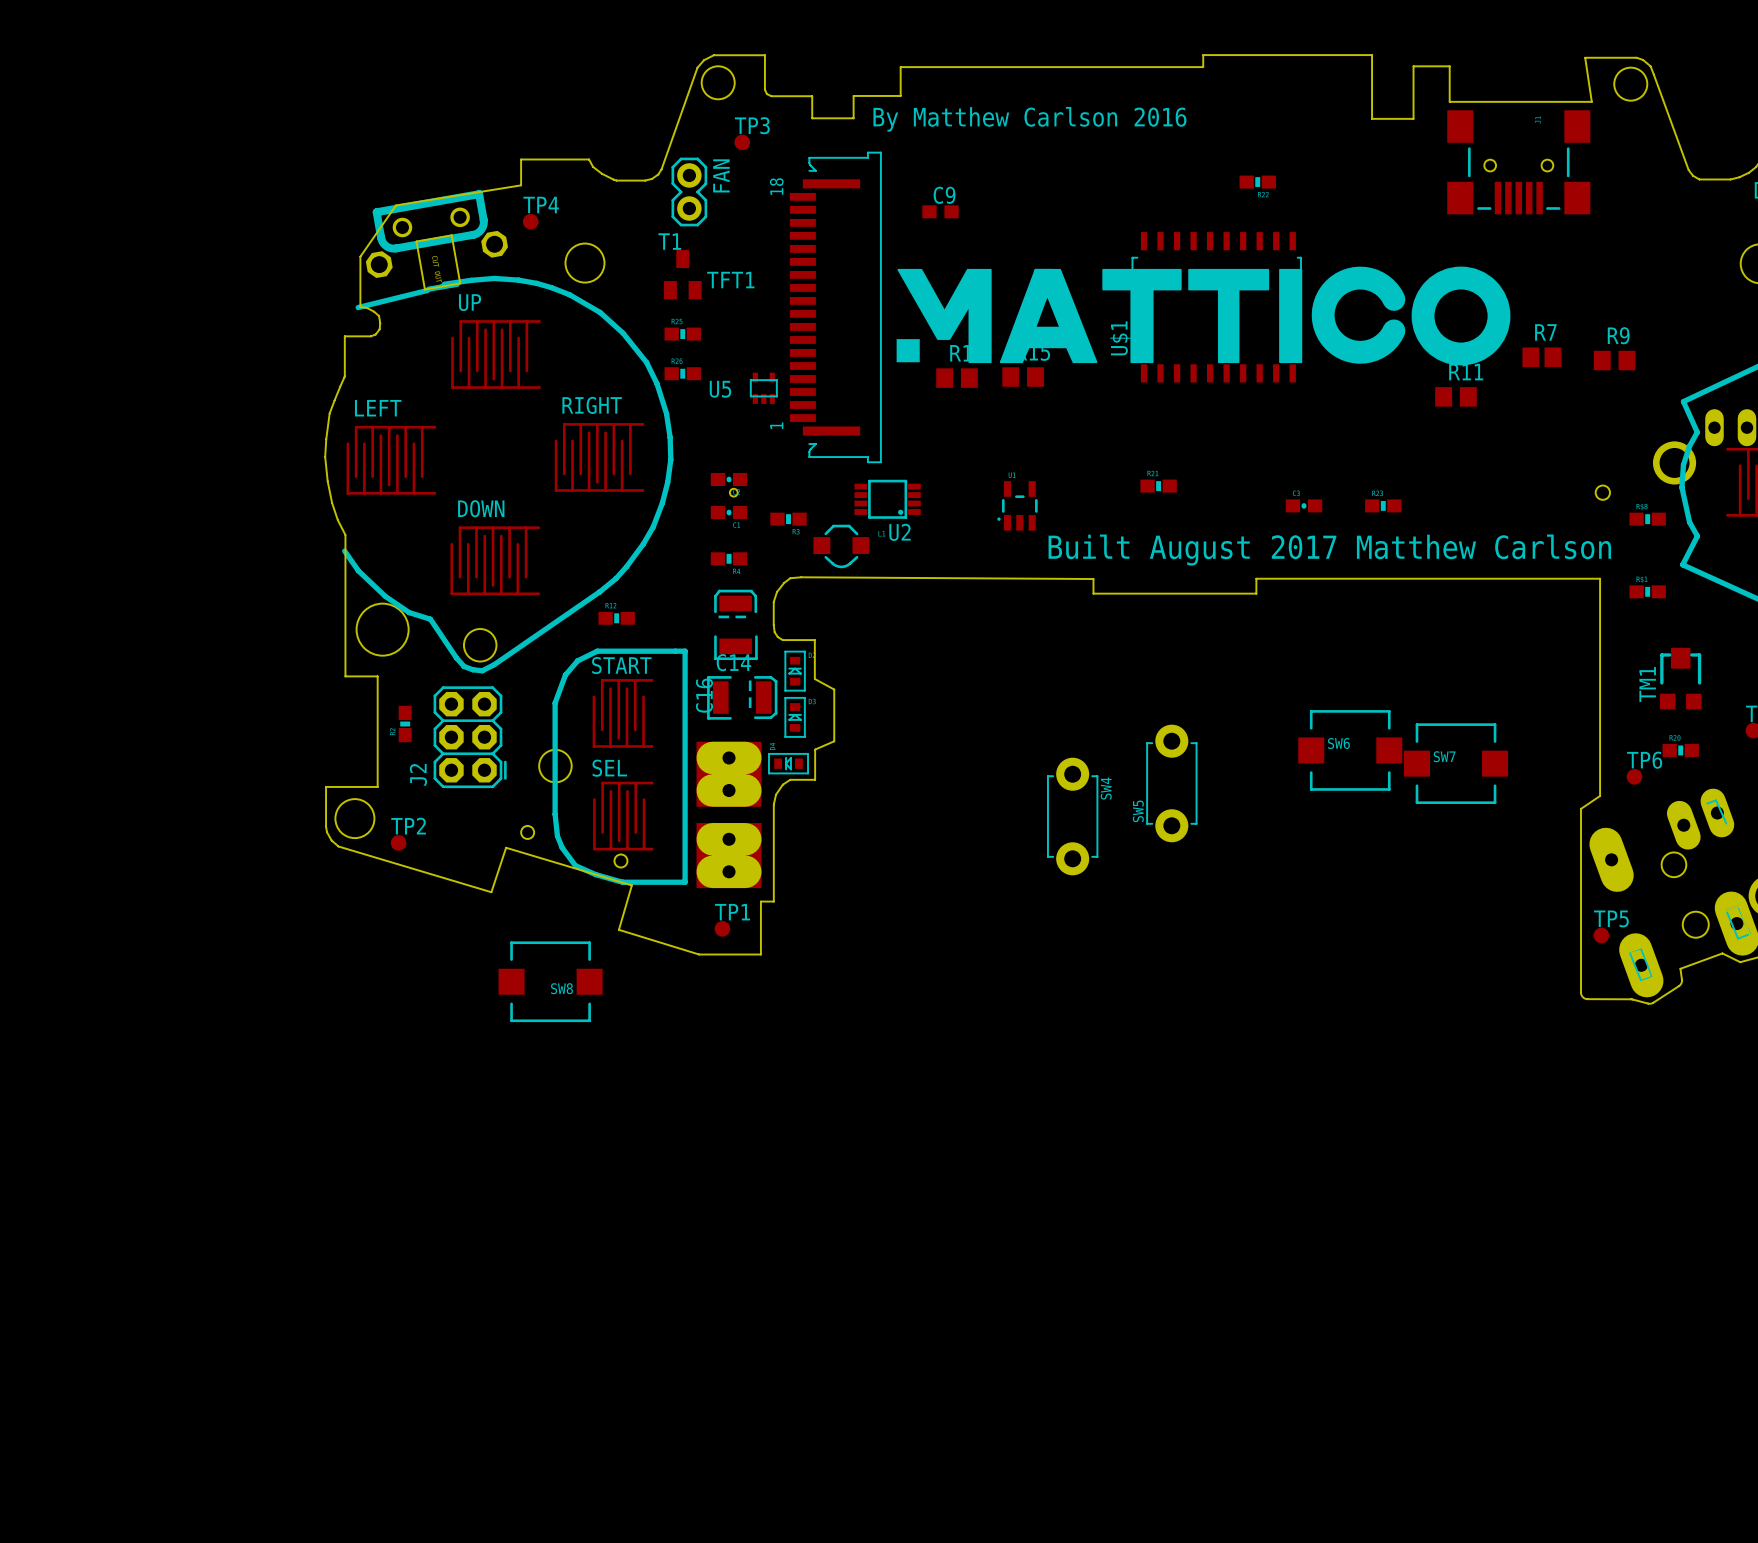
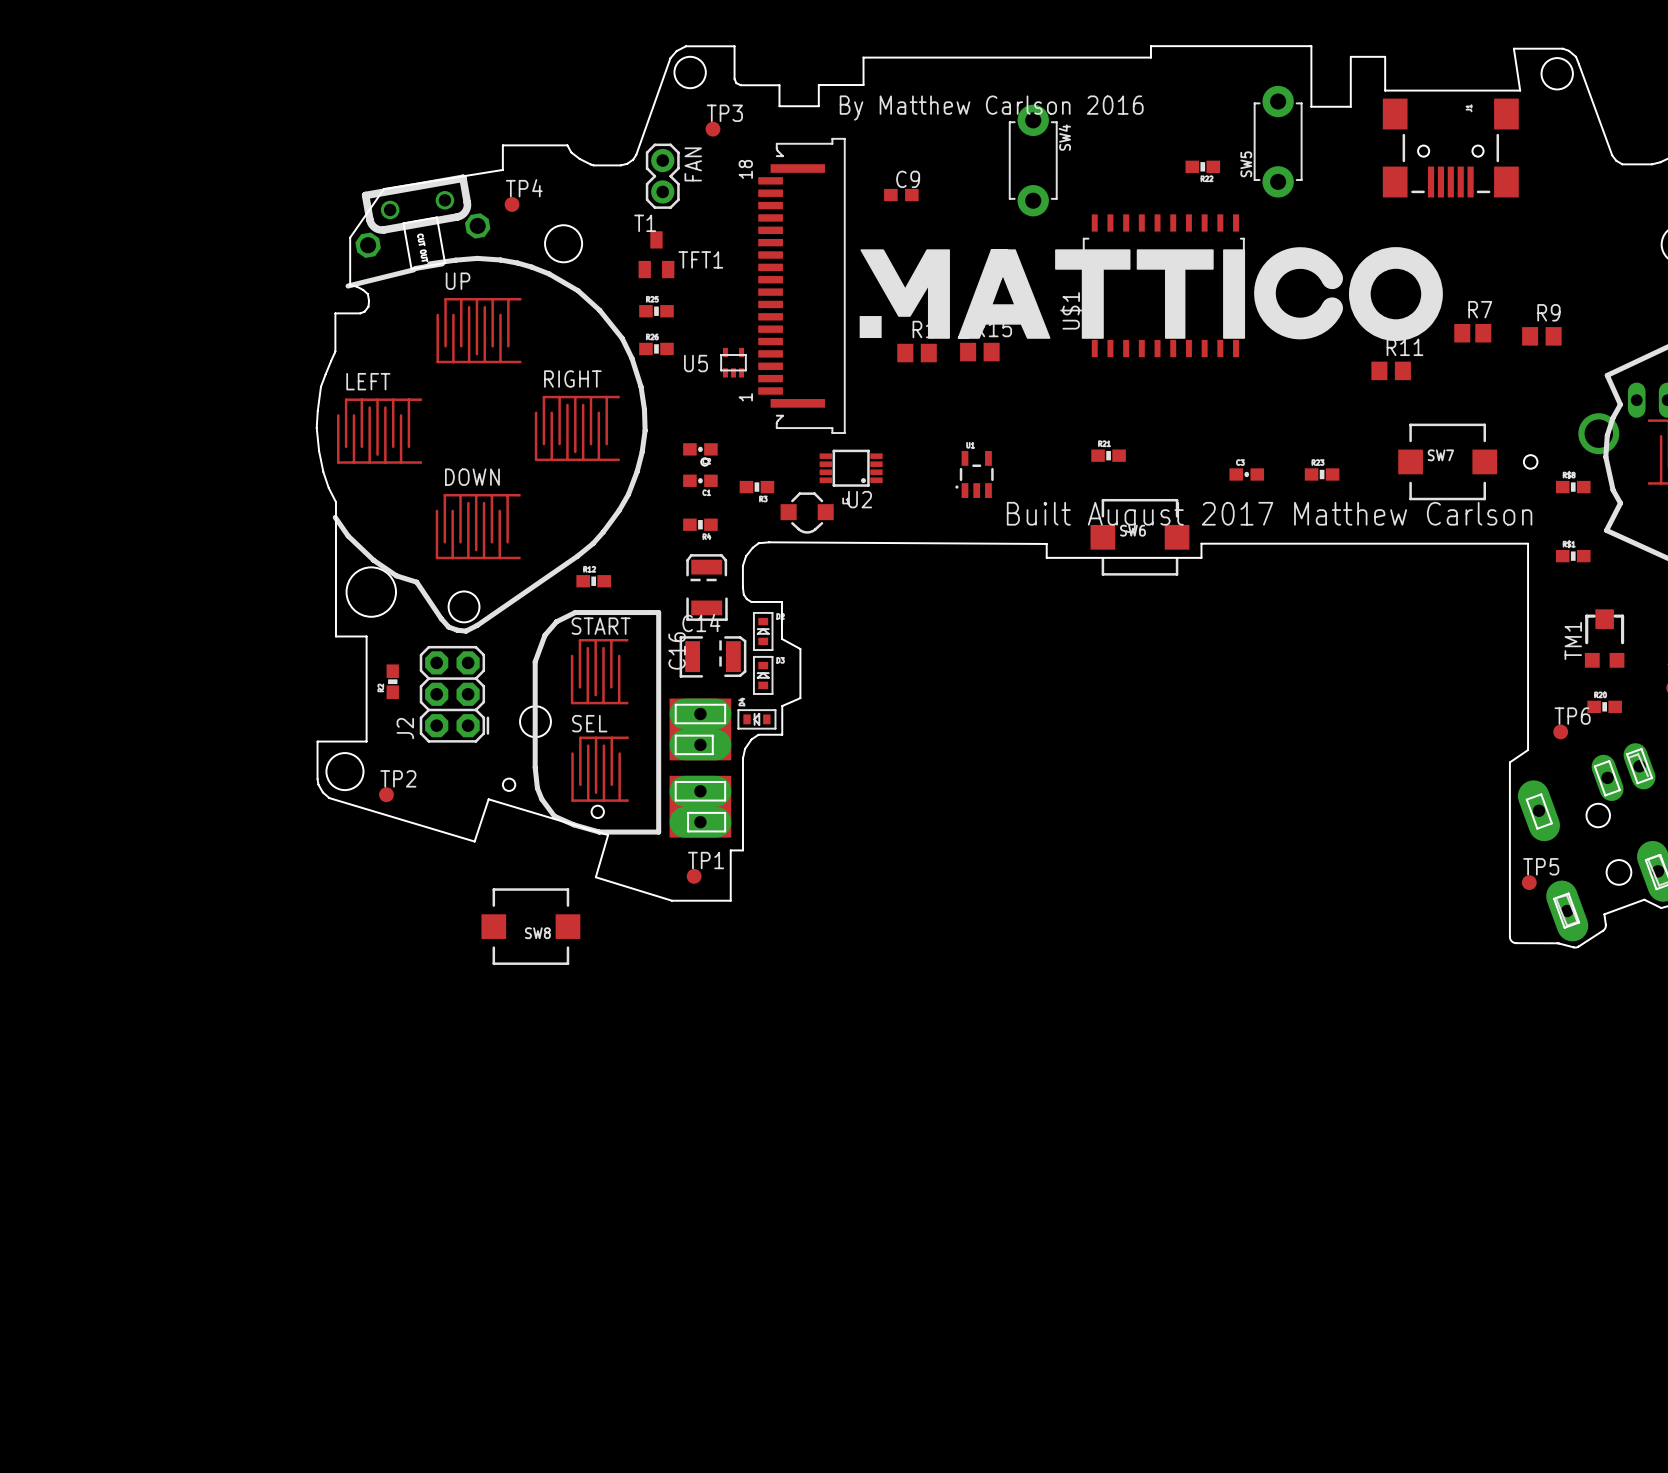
SW6 position: (1350, 750) -> (1139, 537)
SW7 position: (1456, 763) -> (1447, 461)
SW5 position: (1171, 783) -> (1278, 141)
SW4 position: (1072, 816) -> (1033, 160)

